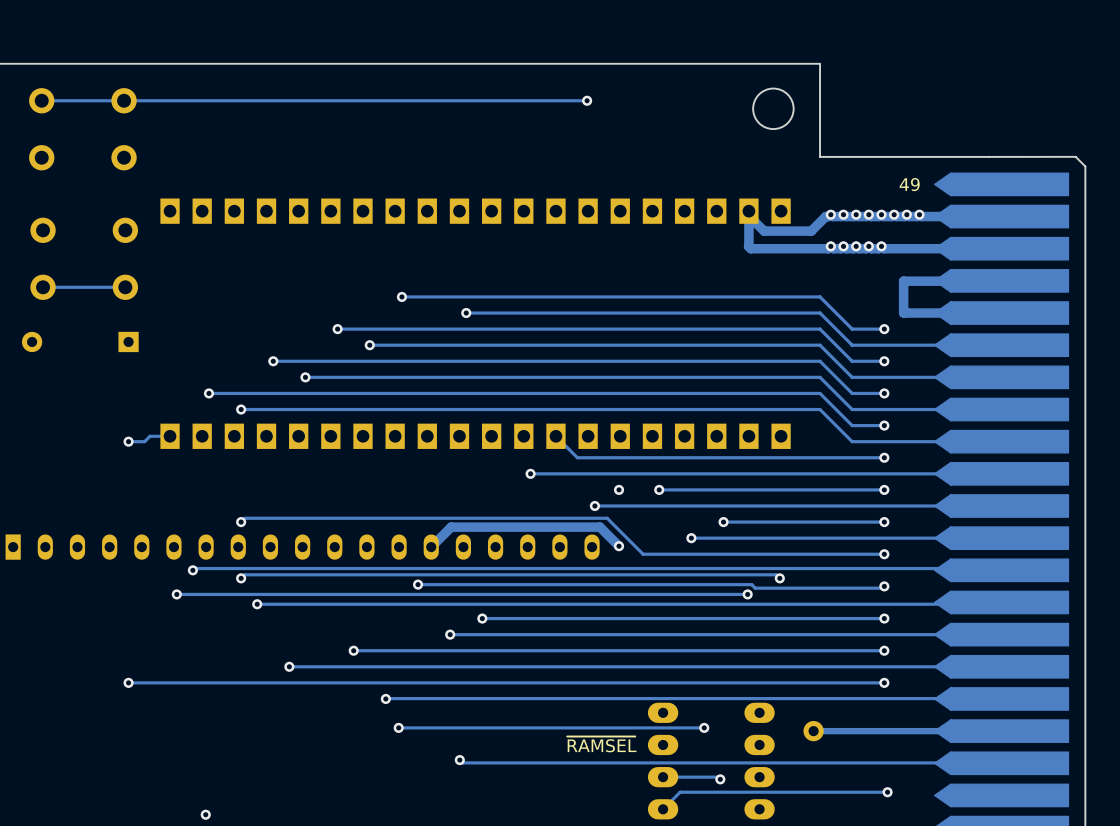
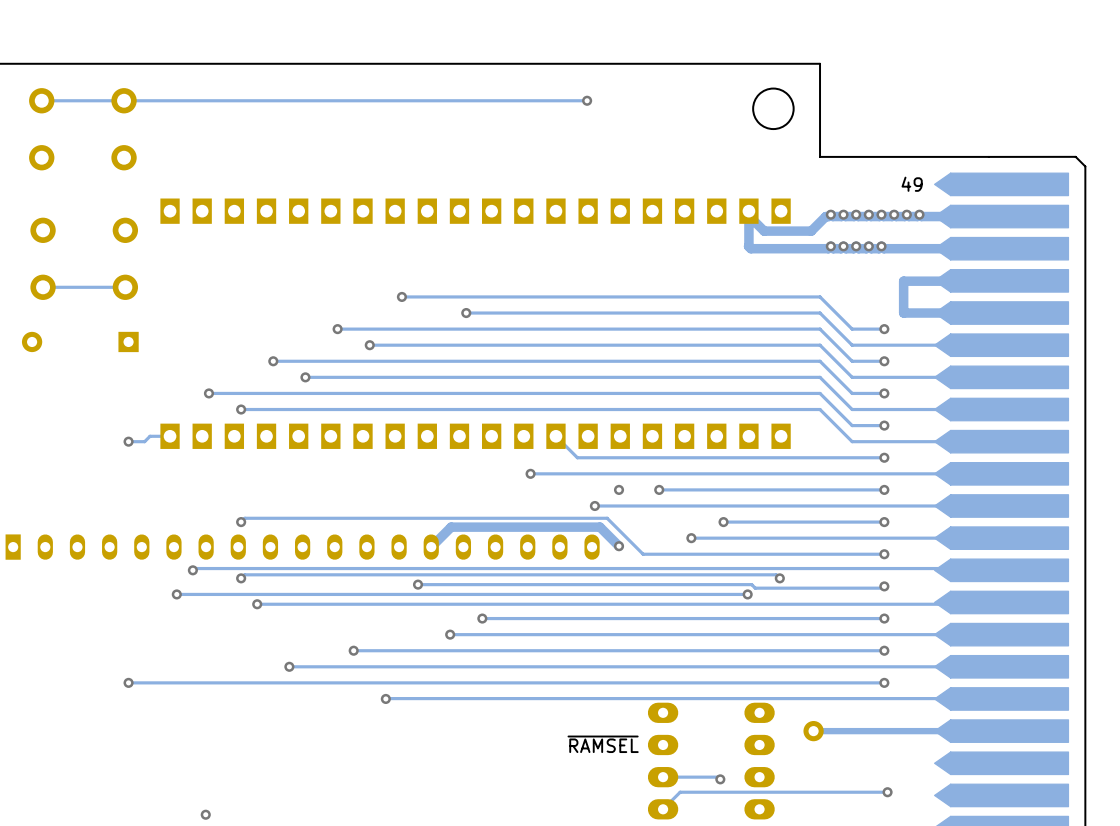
via: (398, 727) -> none
track: (704, 727) (398, 727) -> none
via: (704, 727) -> none
track: (459, 760) (462, 762) (1045, 763) -> none
via: (459, 760) -> none

